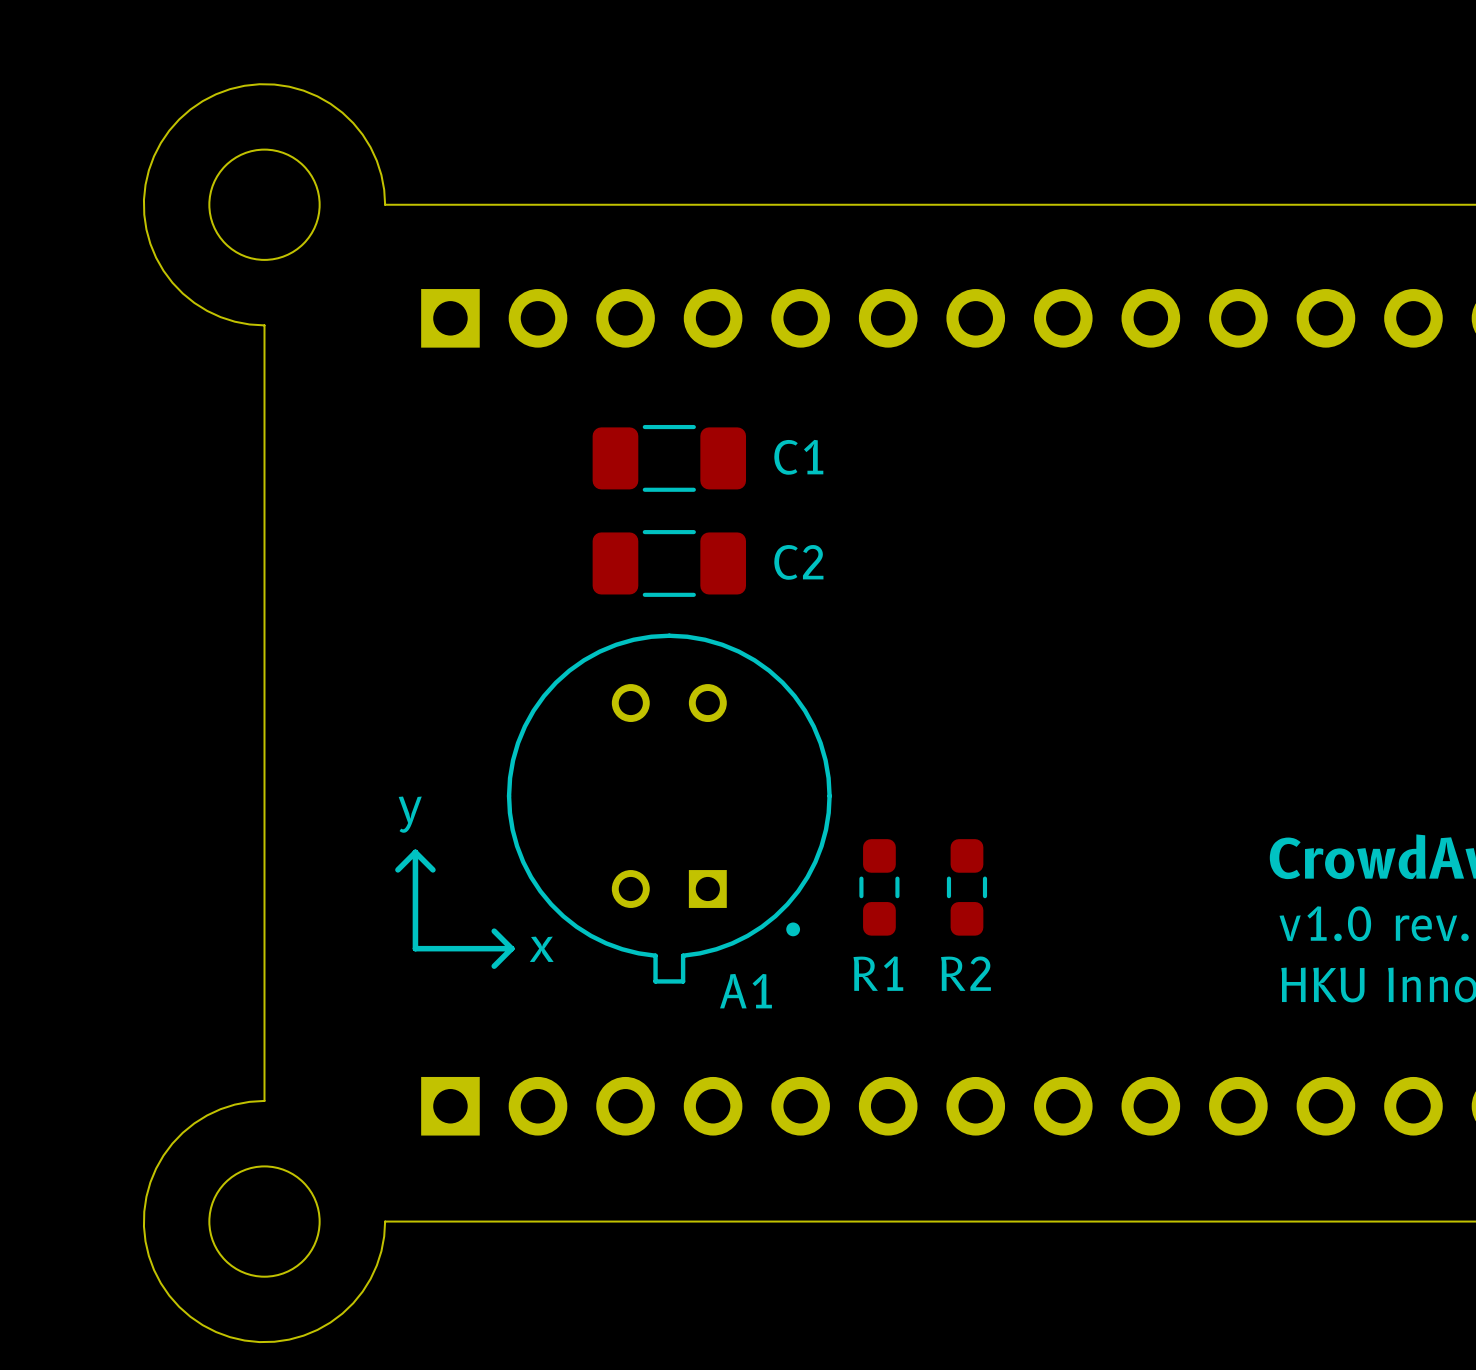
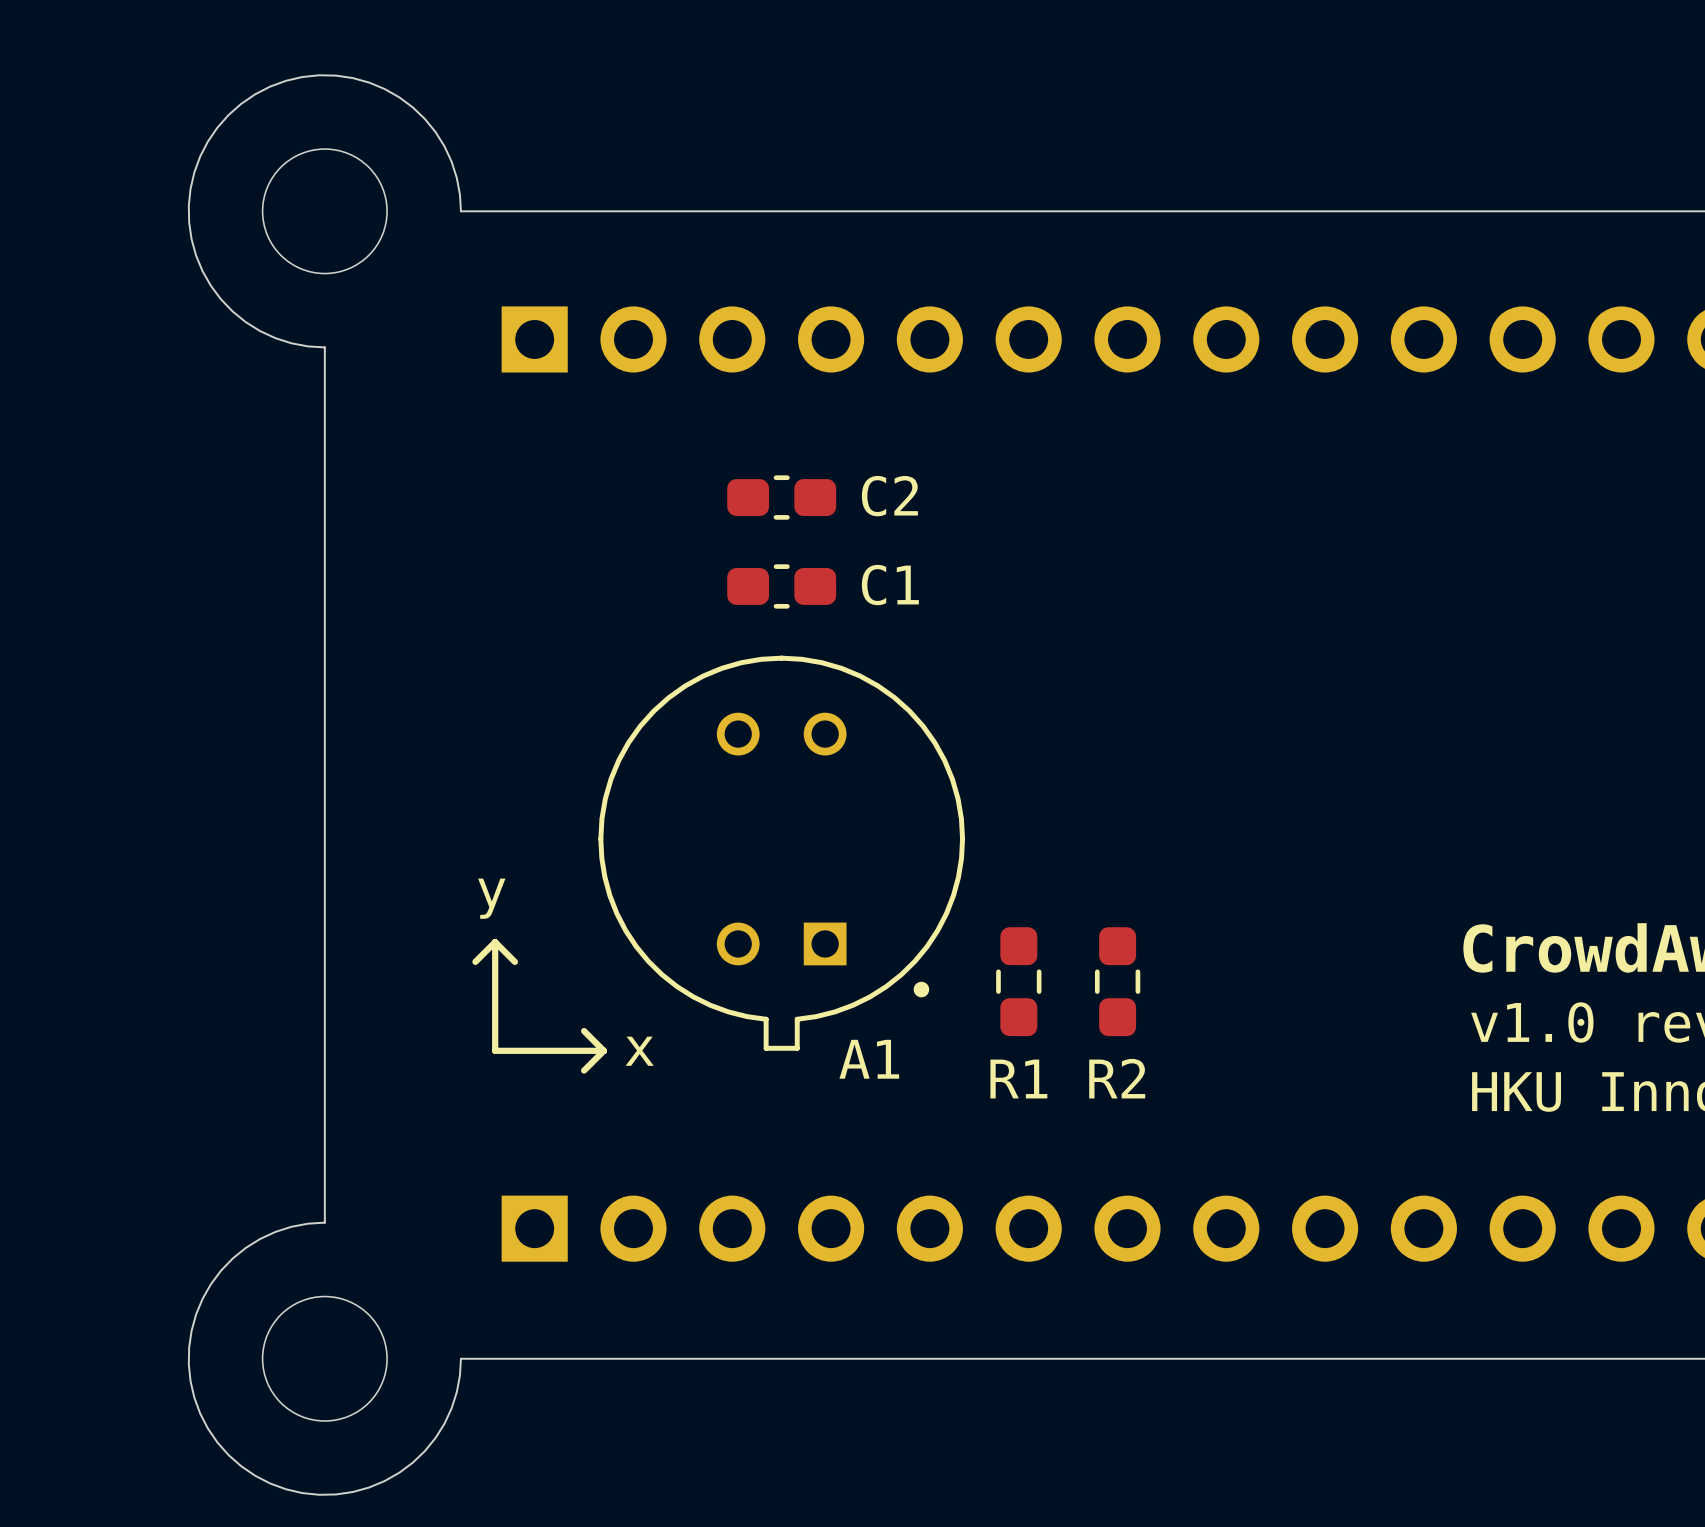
C1 footprint: [592, 424, 747, 492] -> [727, 564, 837, 609]
C2 footprint: [592, 530, 747, 597] -> [727, 475, 837, 520]
A1 position: (669, 808) -> (781, 853)

